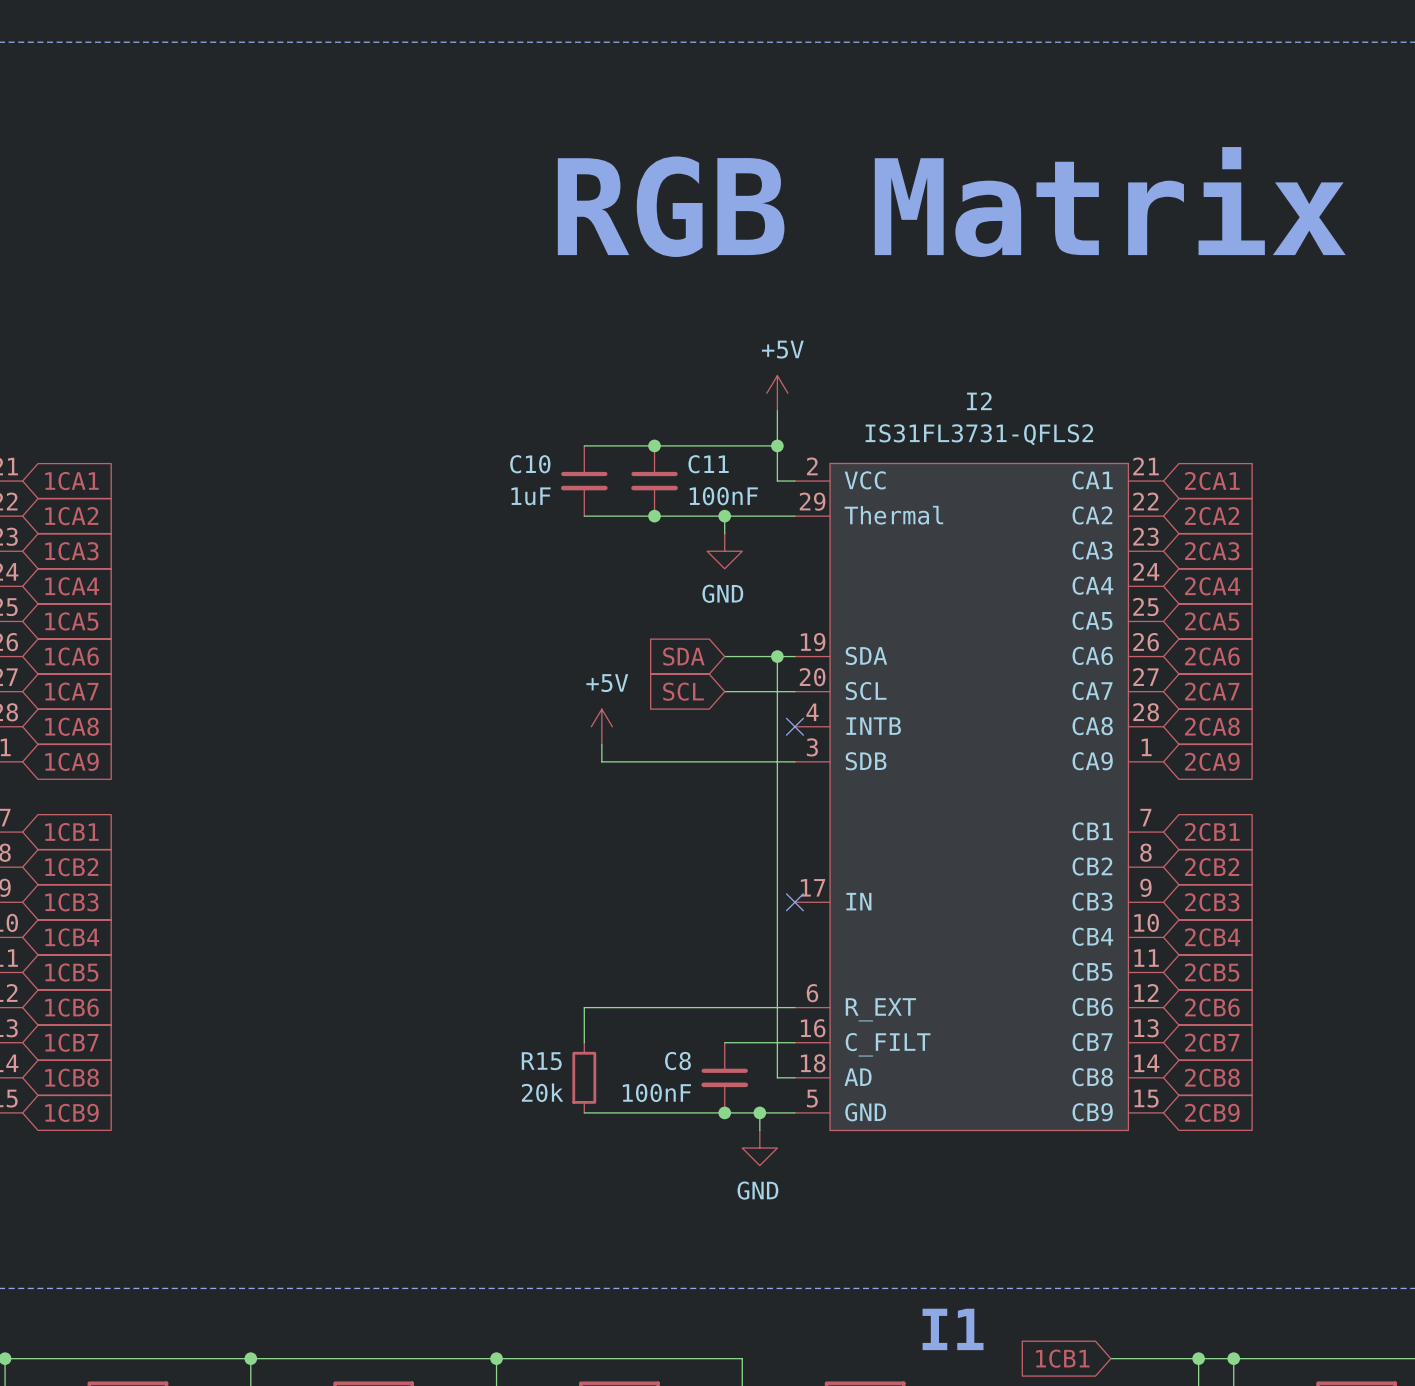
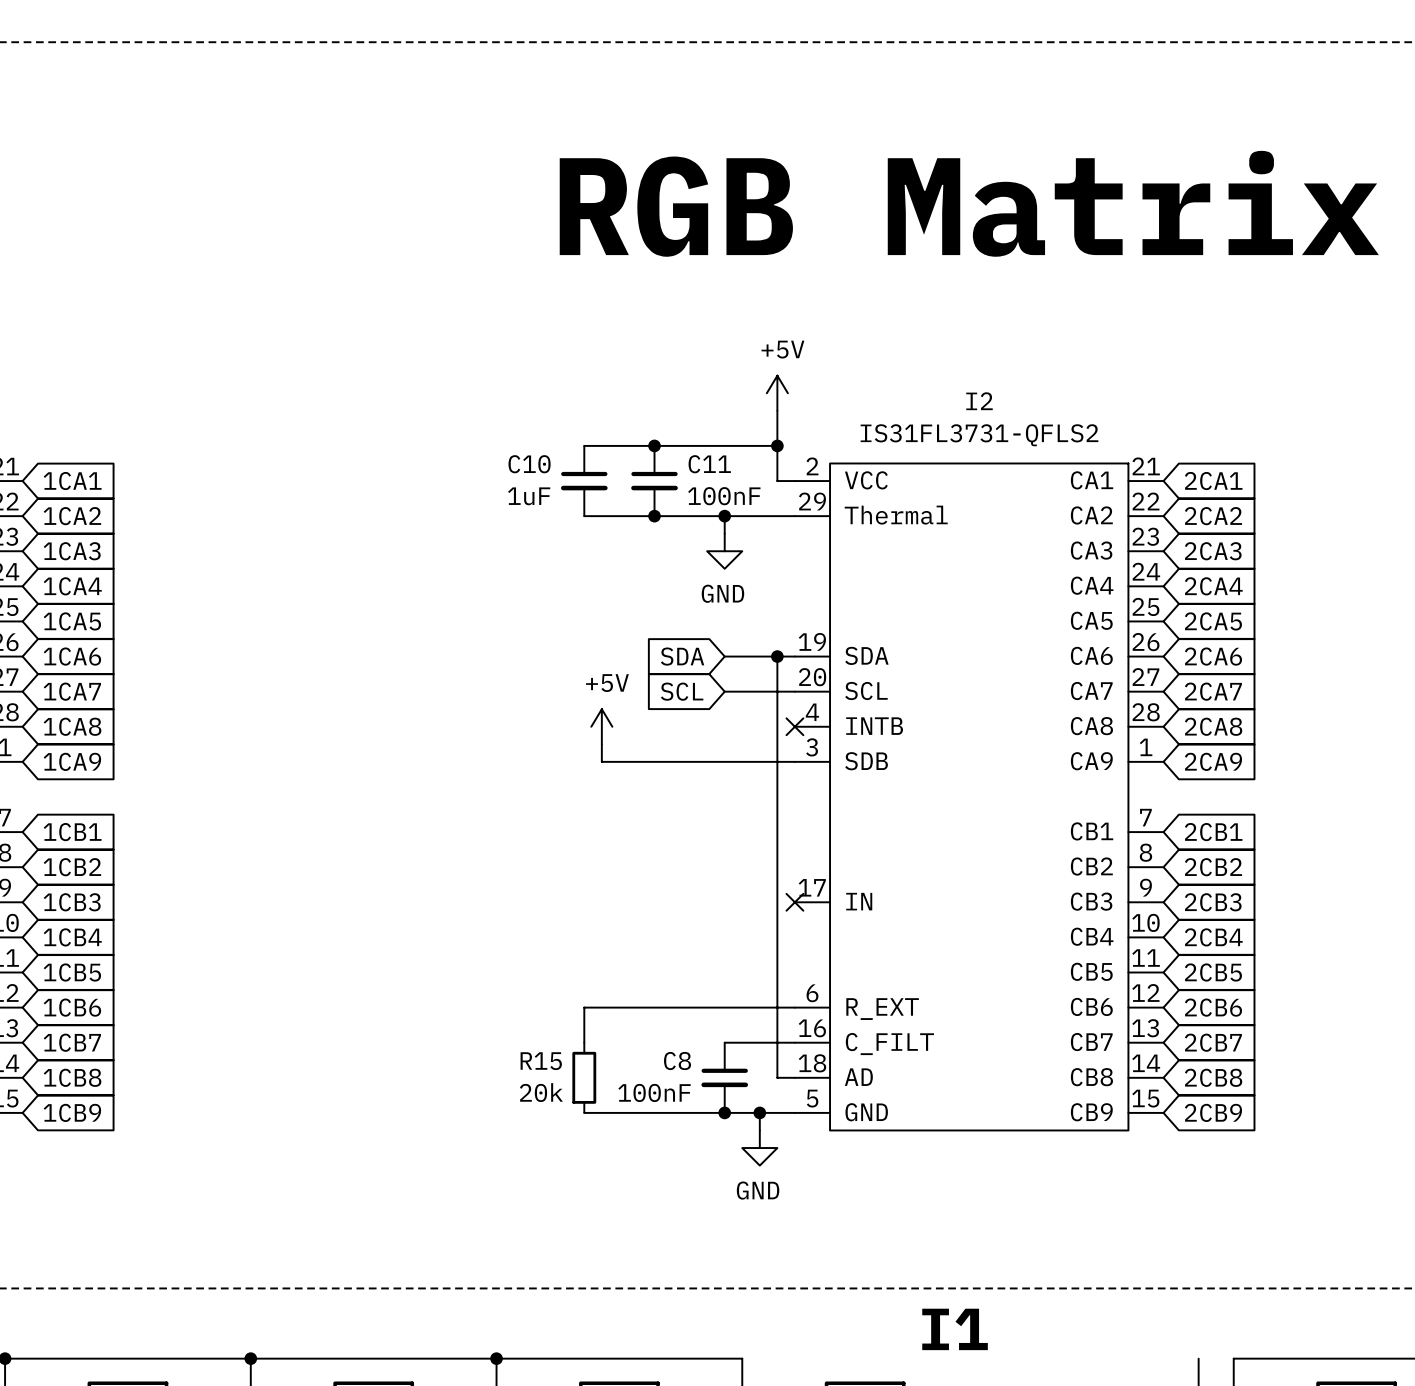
global label: 1CB1 (1062, 1358) -> none
wire: (1110, 1358) (1233, 1358) -> none
junction: (1198, 1358) -> none
junction: (1233, 1358) -> none

